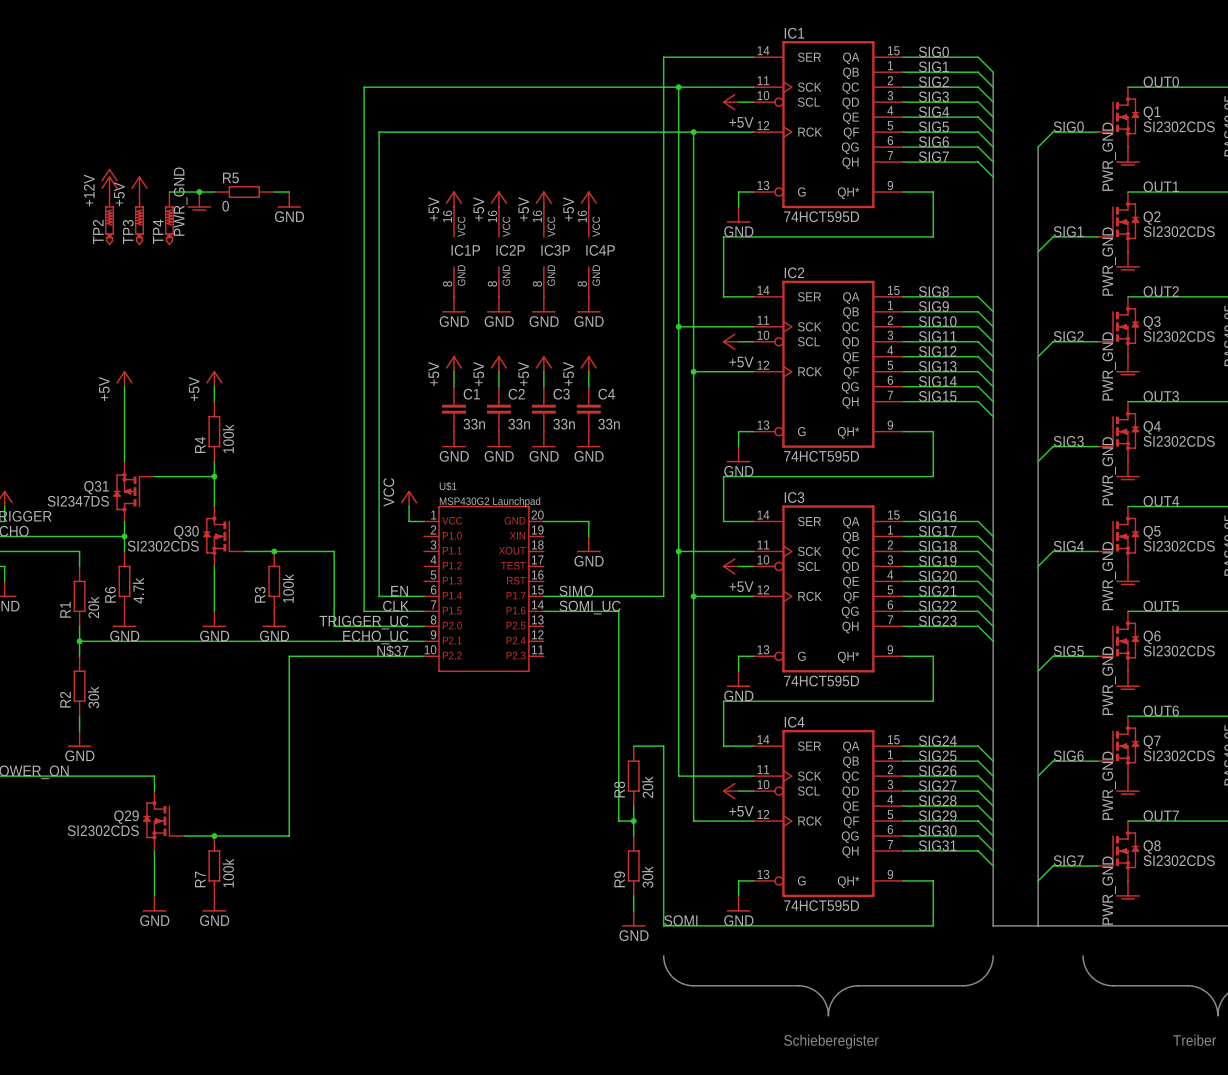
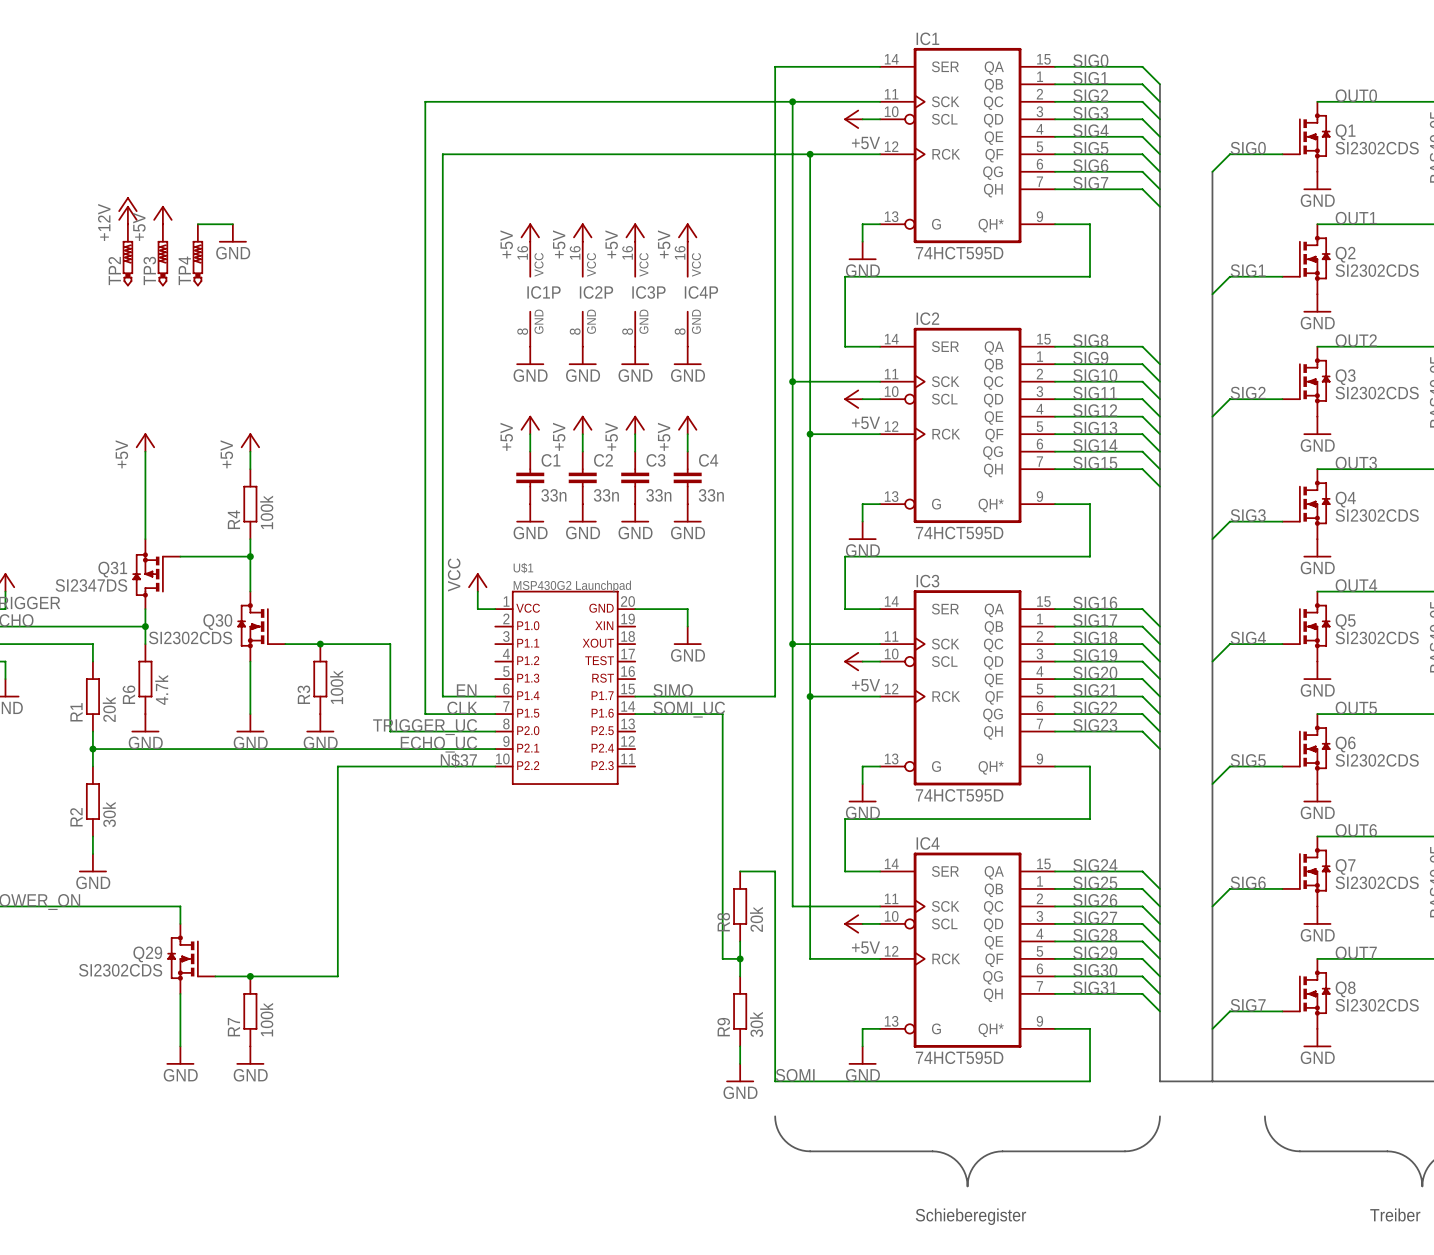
power symbol: PWR_GND (1127, 156) -> GND (1317, 180)
wire: (199, 192) (214, 192) -> none
junction: (199, 192) -> none
R5: 0 (244, 192) -> none
wire: (274, 192) (289, 192) -> none
power symbol: GND (289, 199) -> none
power symbol: PWR_GND (199, 201) -> GND (232, 233)
power symbol: PWR_GND (1127, 261) -> GND (1317, 303)
power symbol: PWR_GND (1127, 366) -> GND (1317, 425)
power symbol: PWR_GND (1127, 470) -> GND (1317, 548)
power symbol: PWR_GND (1127, 575) -> GND (1317, 670)
power symbol: PWR_GND (1127, 680) -> GND (1317, 793)
power symbol: PWR_GND (1127, 785) -> GND (1317, 915)
power symbol: PWR_GND (1127, 890) -> GND (1317, 1038)

